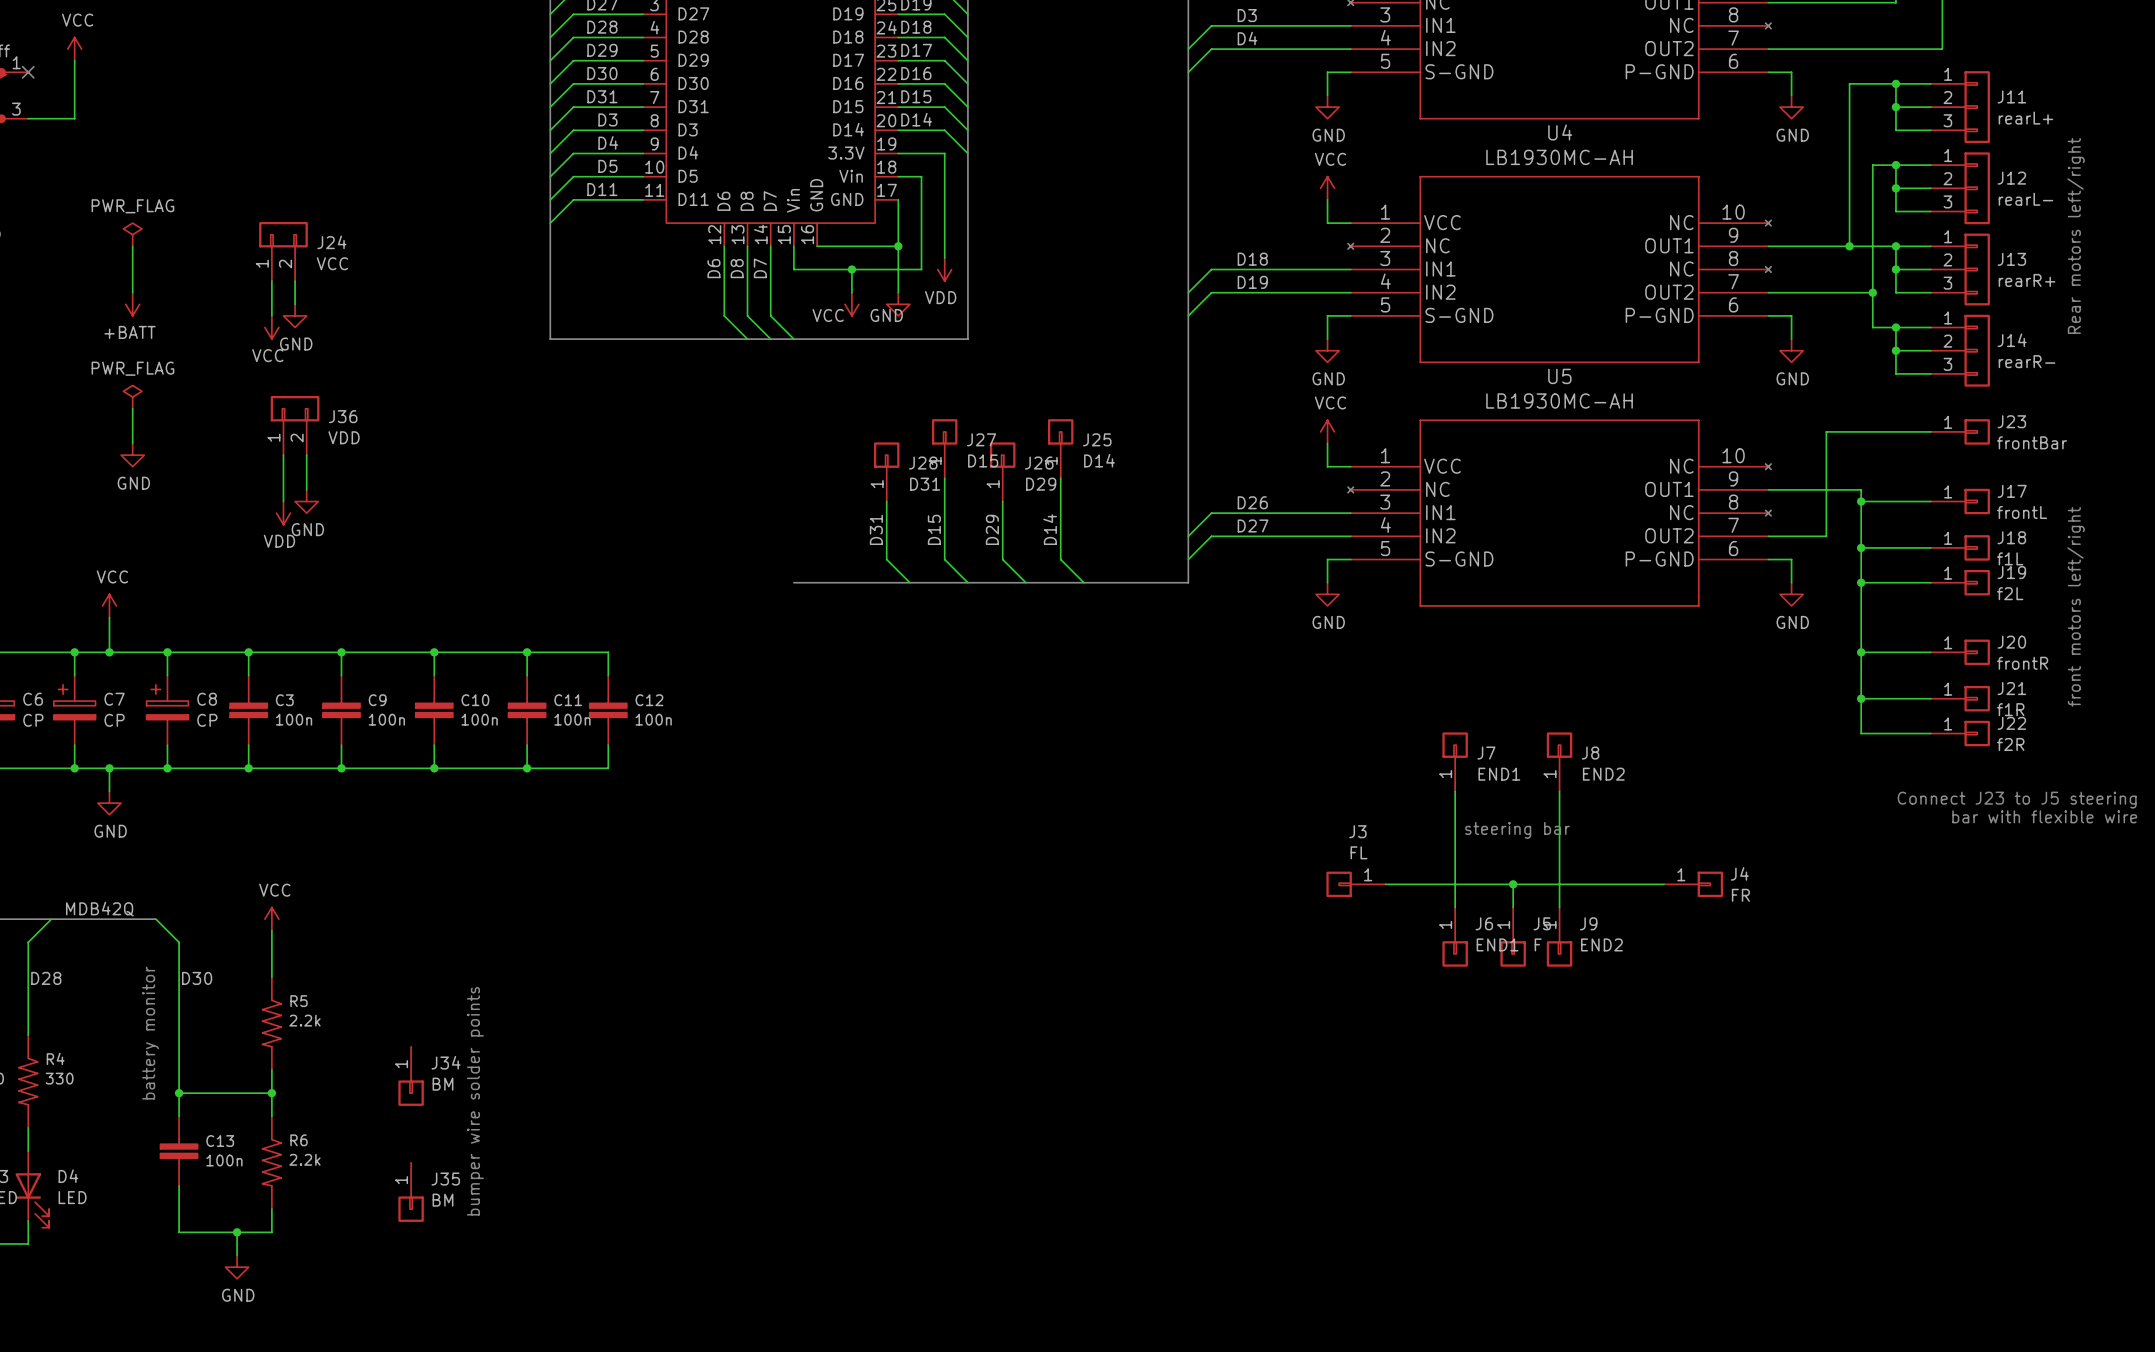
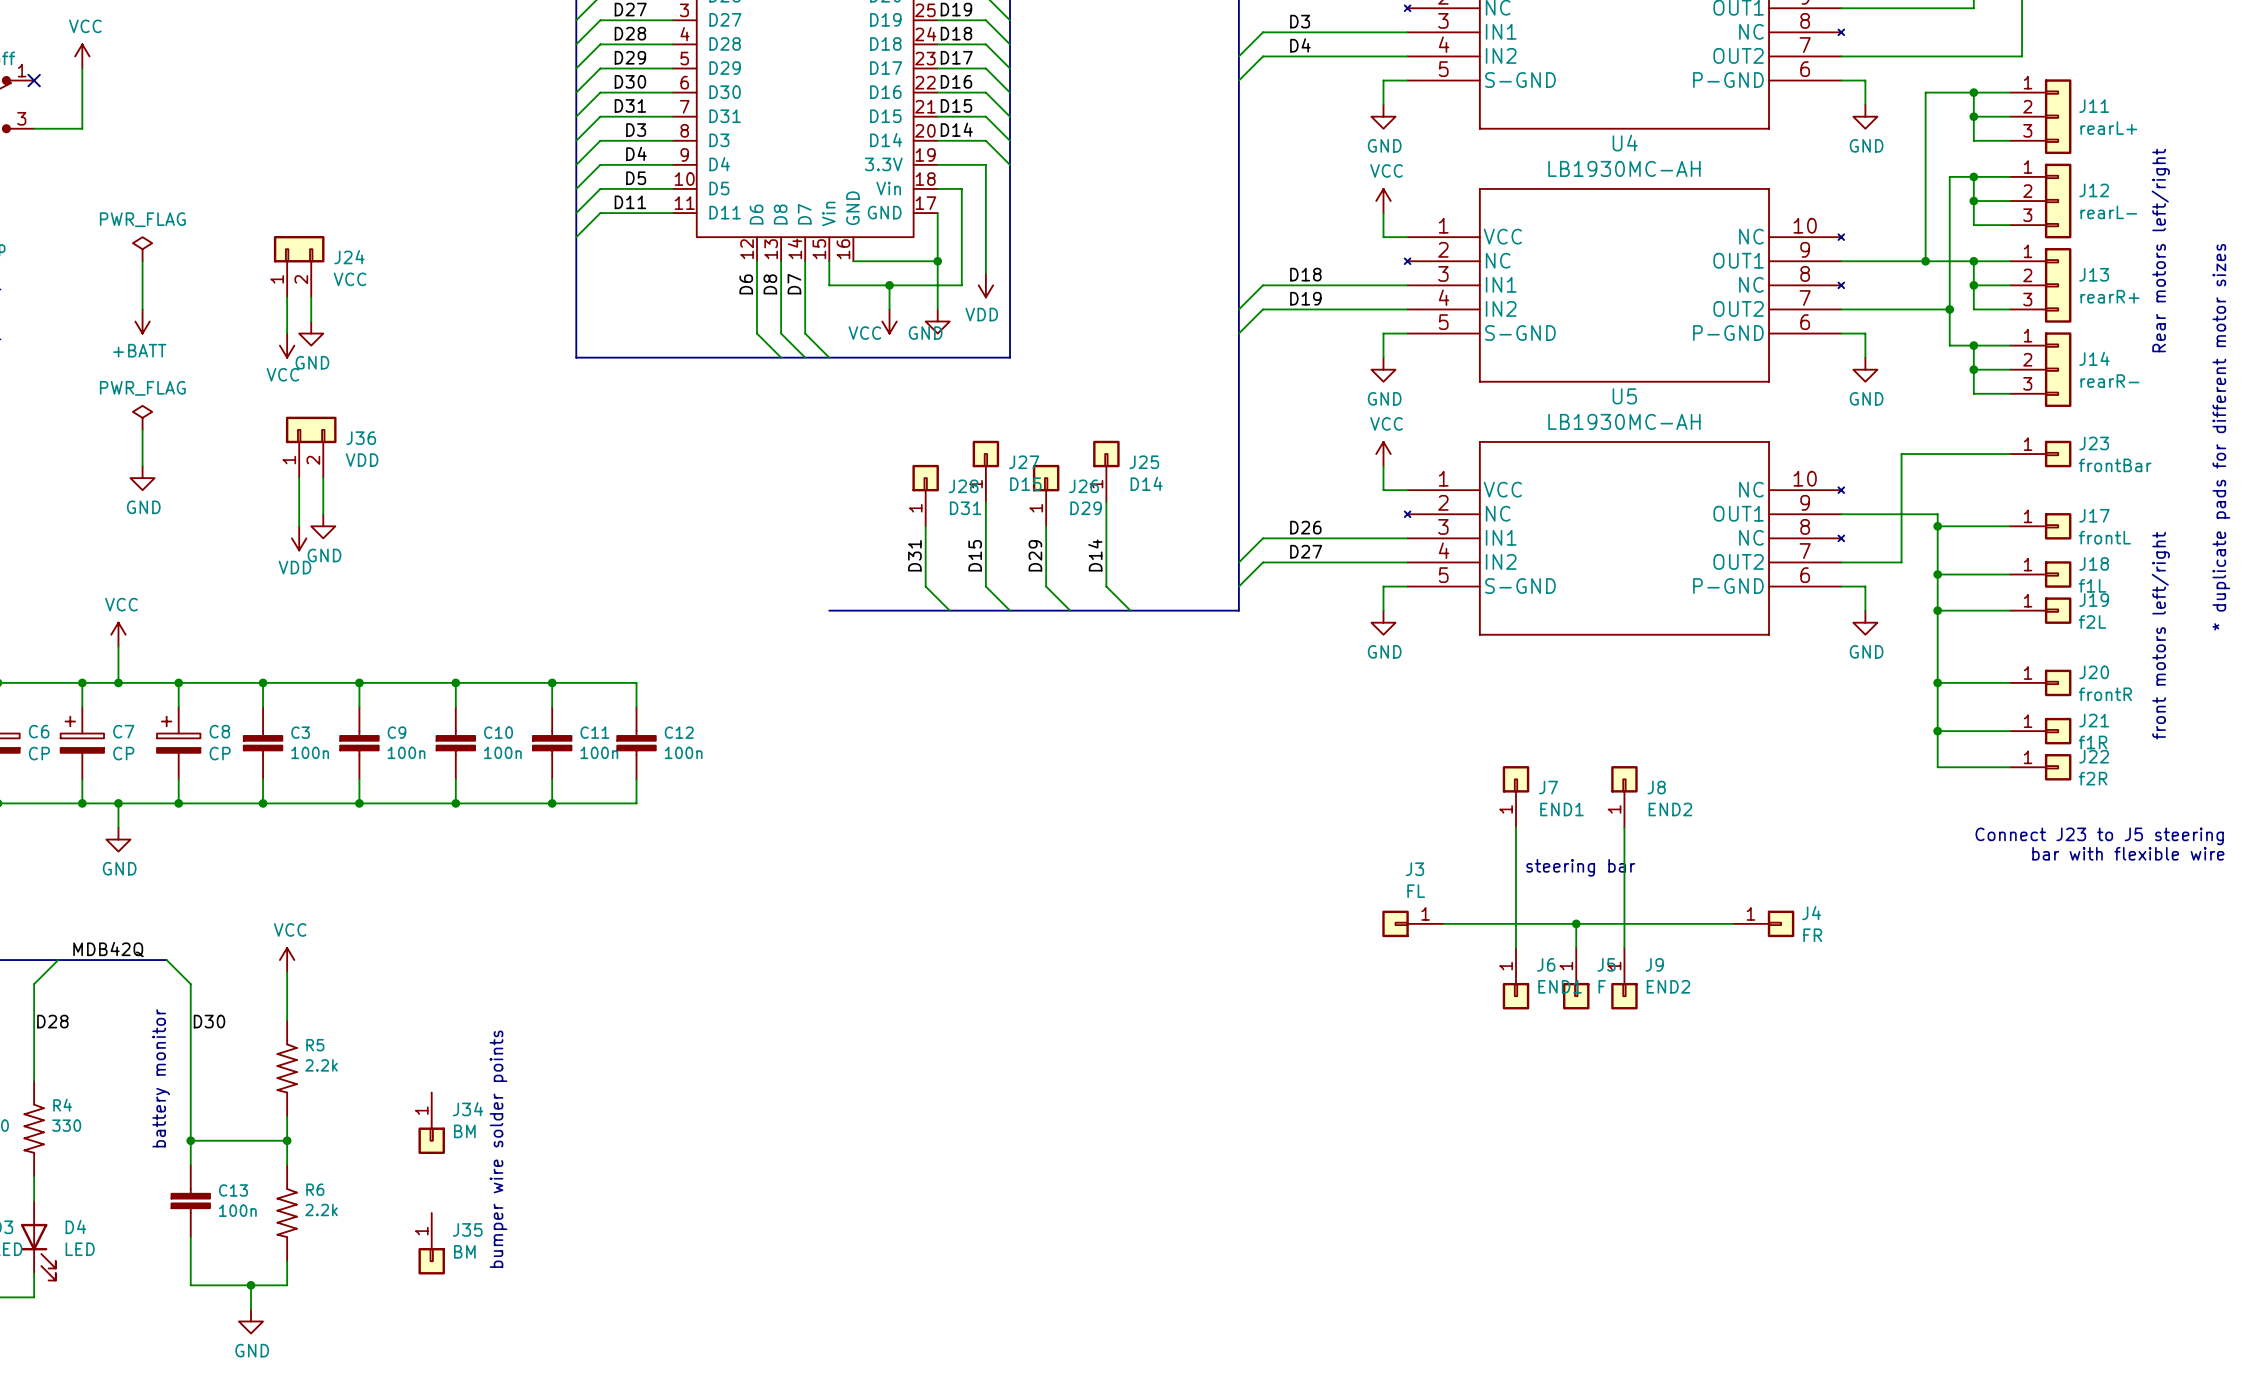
text: none -> * duplicate pads for different motor sizes (2221, 437)

